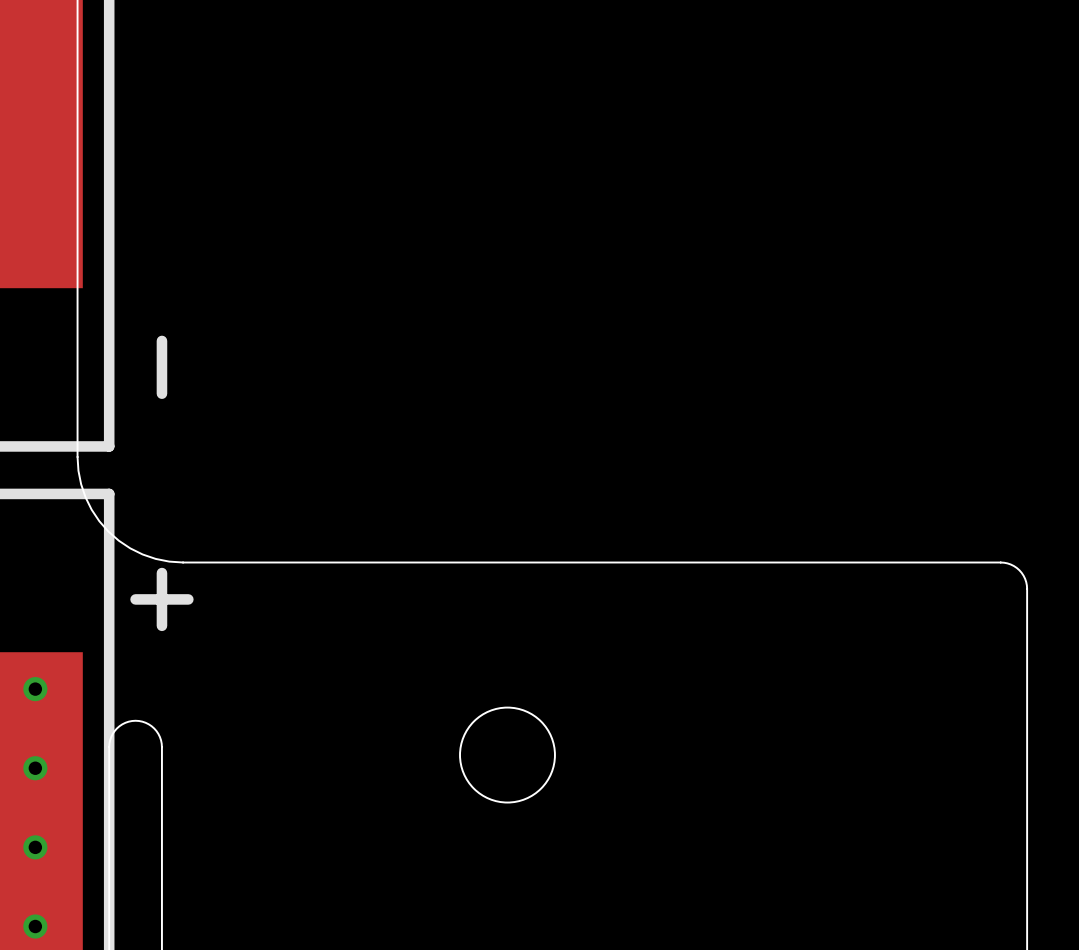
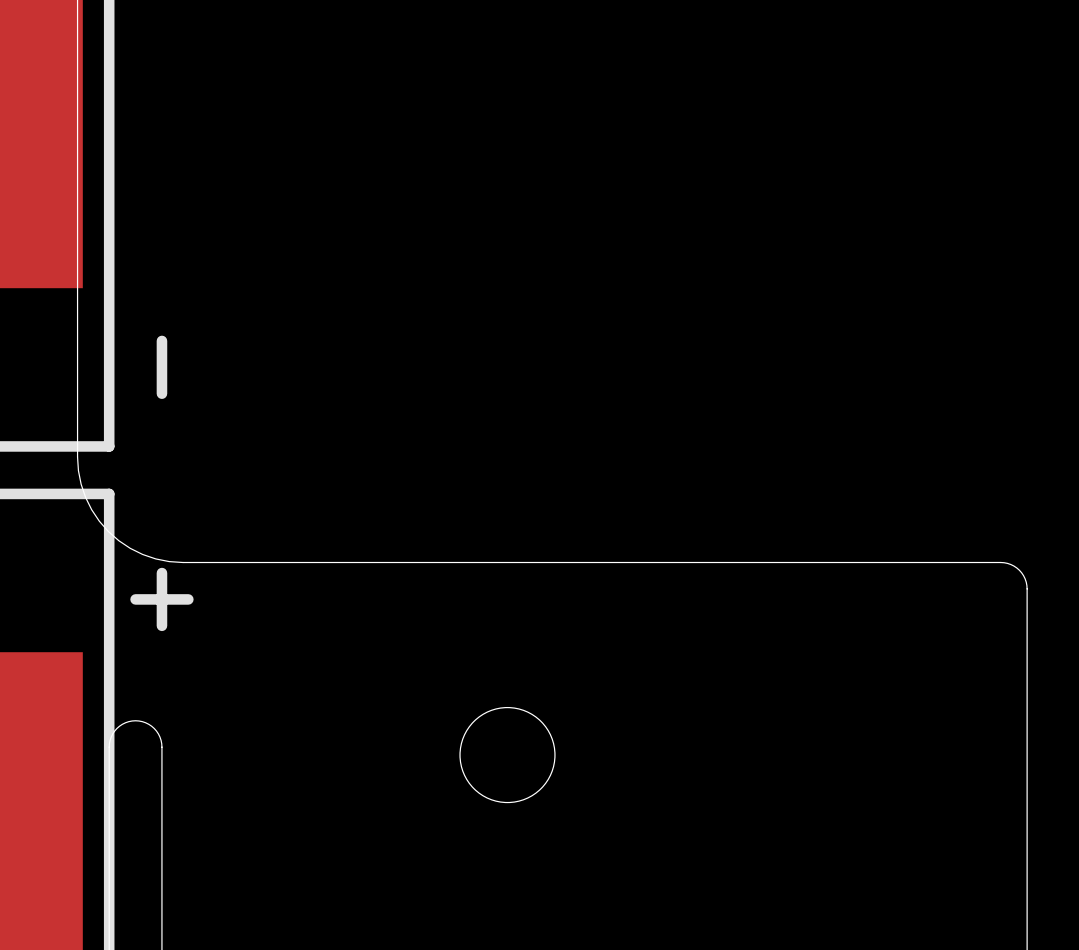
via: (35, 689) -> none
via: (35, 768) -> none
via: (35, 847) -> none
via: (35, 926) -> none

